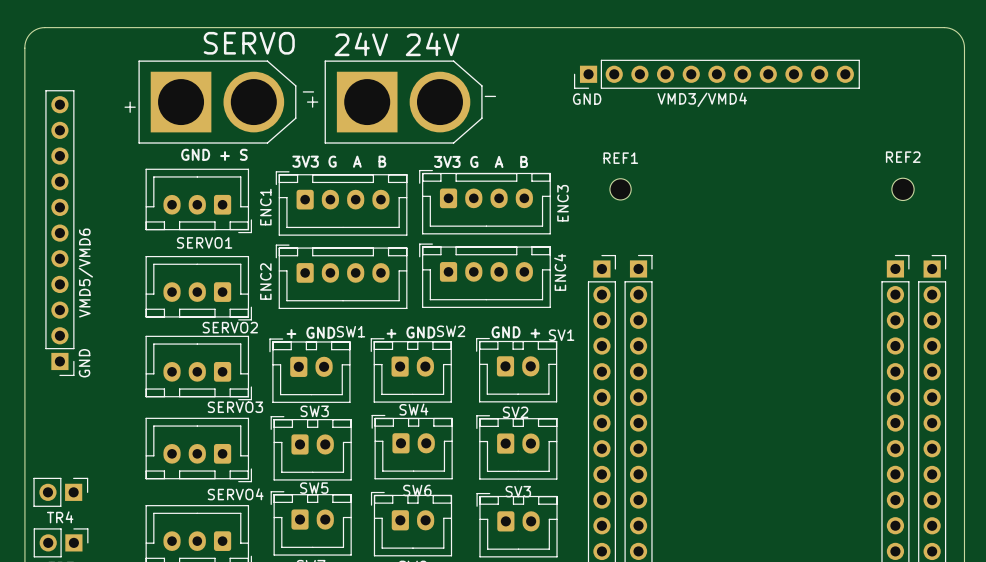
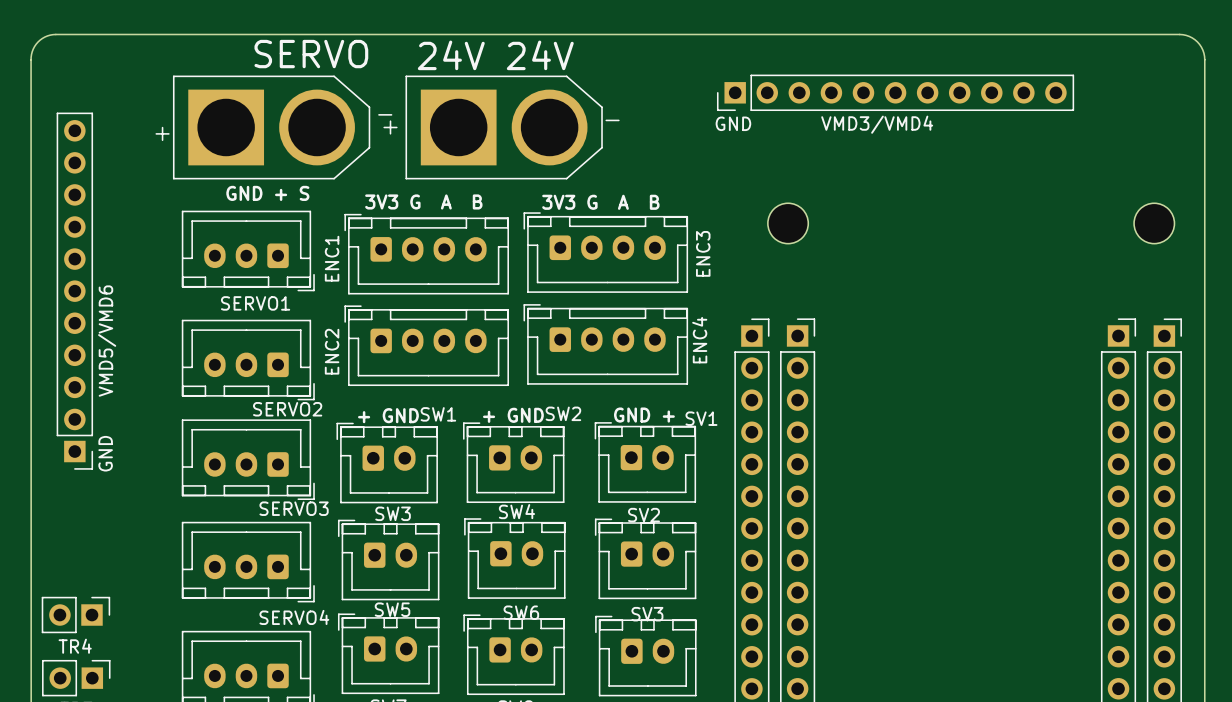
part: none -> (788, 223)
part: none -> (1154, 223)
REF1: (620, 189) -> none
REF2: (903, 189) -> none

